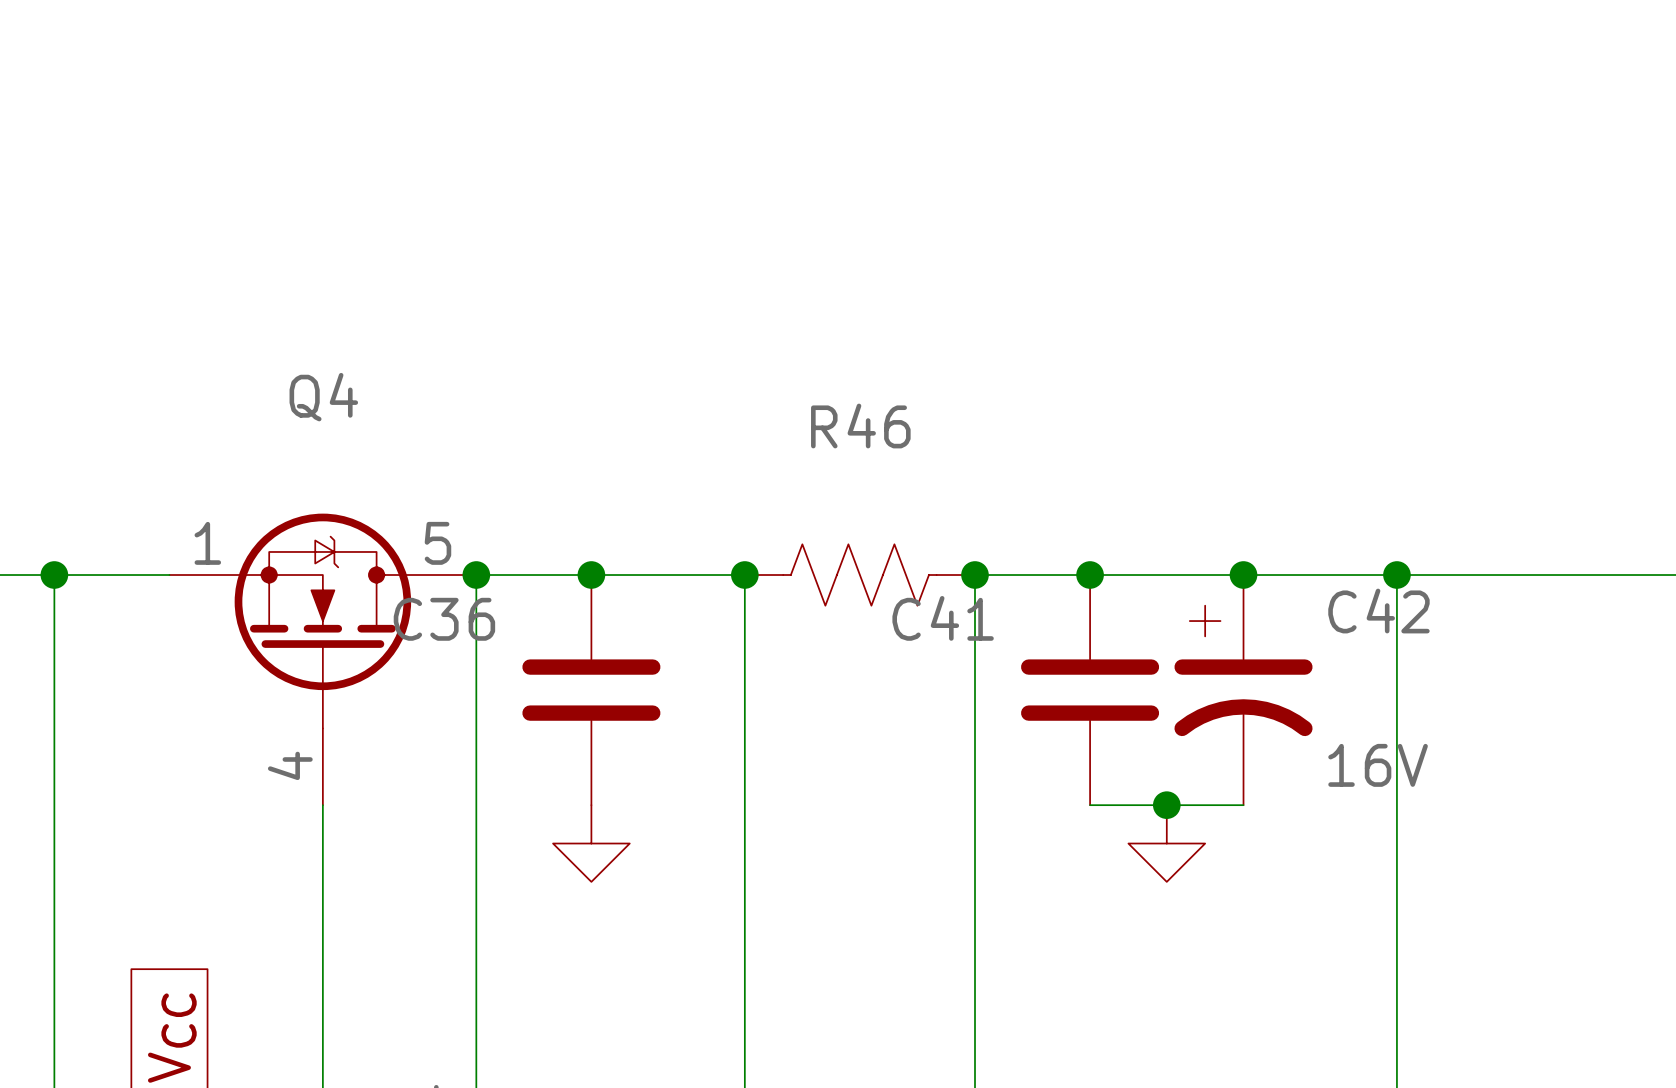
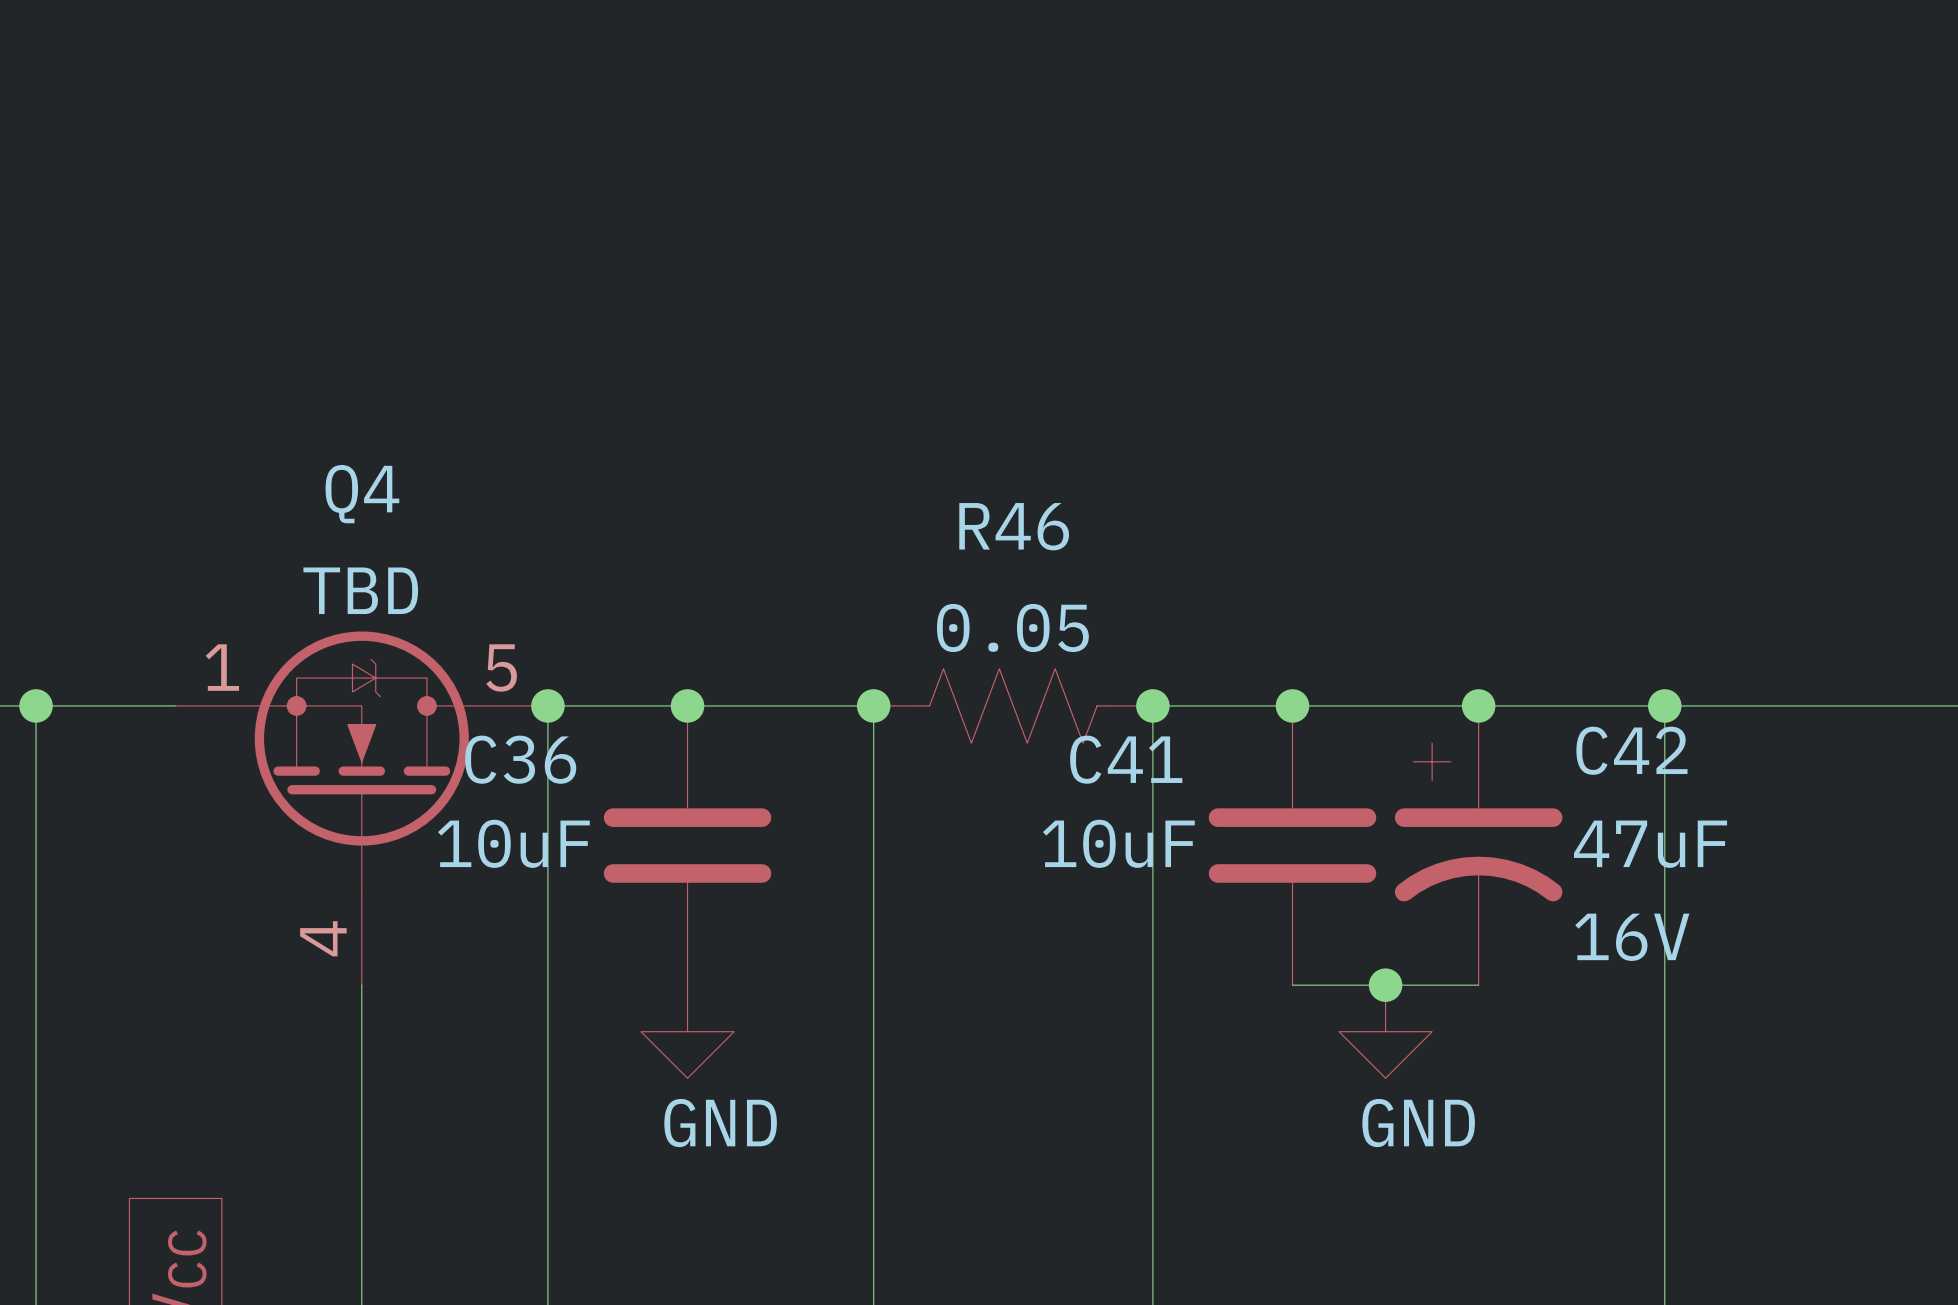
Q4 value: none -> TBD (360, 590)
R46 value: none -> 0.05 (1012, 627)
C42 value: none -> 47uF (1650, 844)
C36 value: none -> 10uF (513, 843)
C41 value: none -> 10uF (1118, 843)
power symbol text: none -> GND (720, 1123)
power symbol text: none -> GND (1418, 1123)

